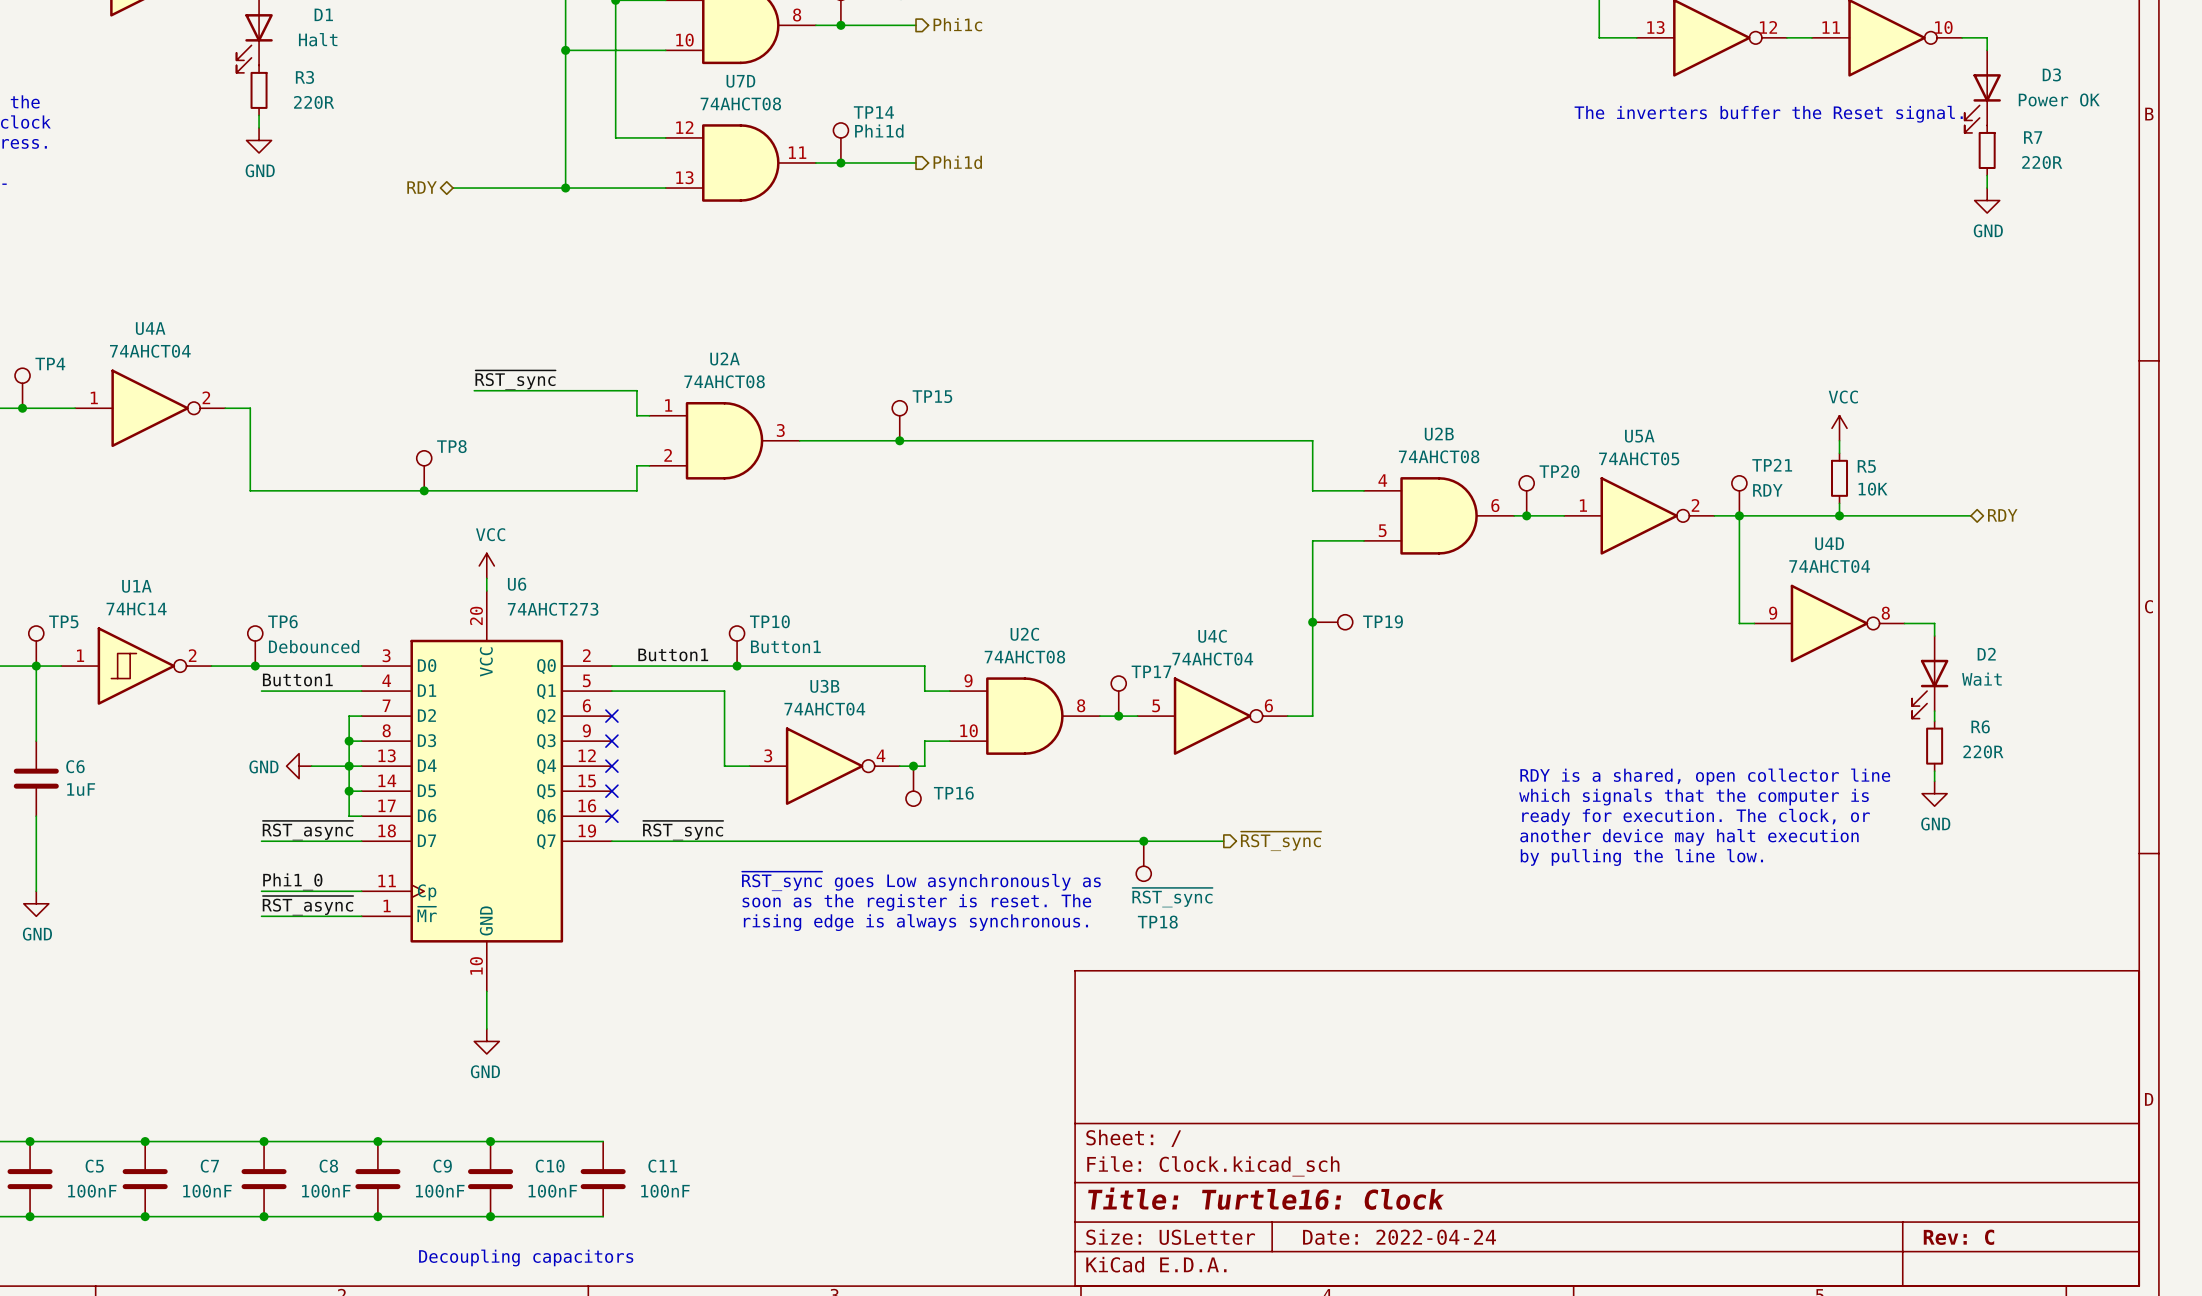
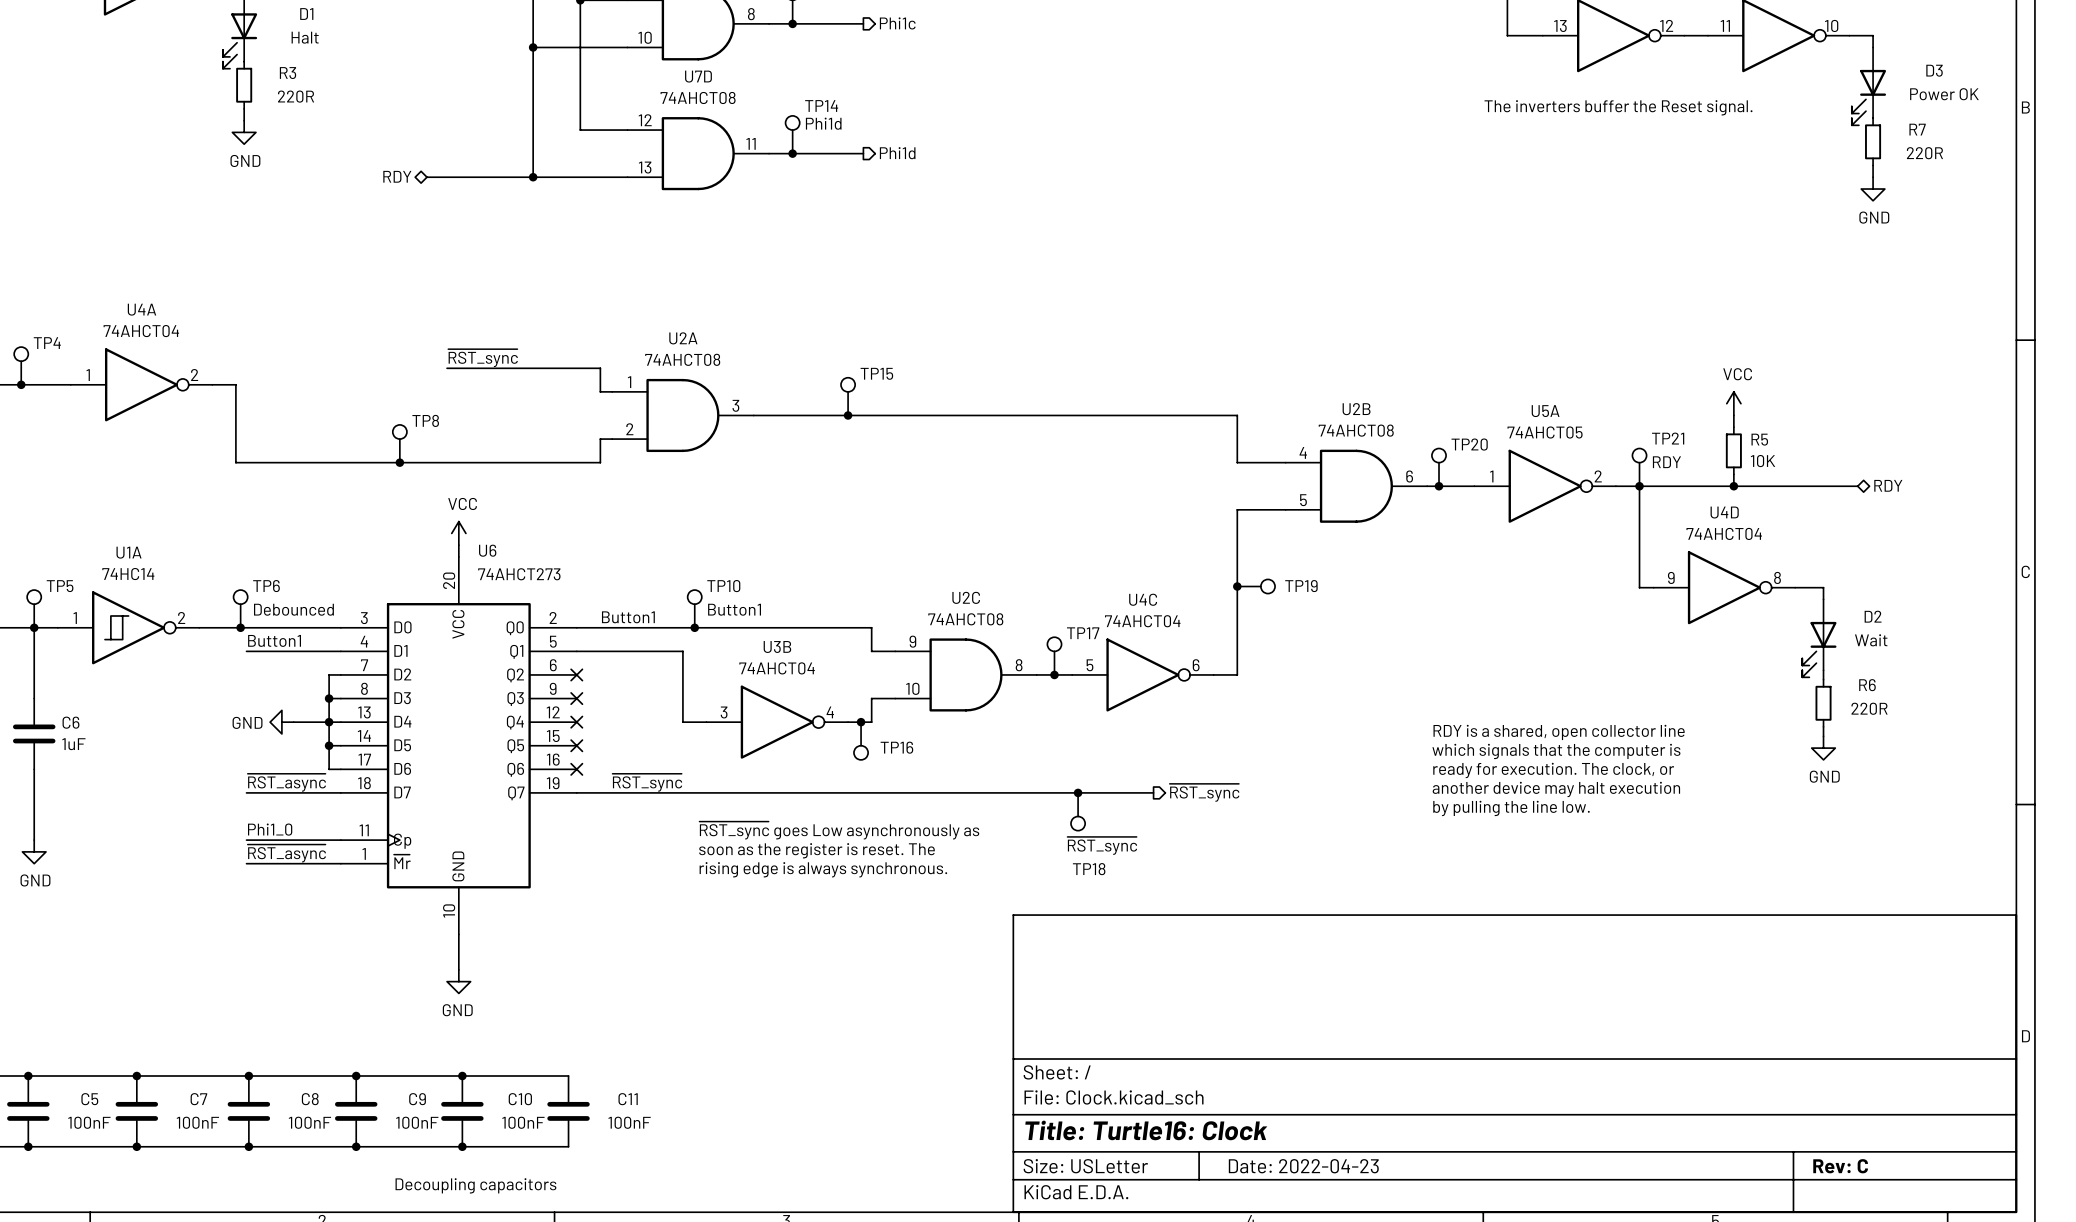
title block: Date: 2022-04-24 (1399, 1237) -> Date: 2022-04-23 (1303, 1166)

